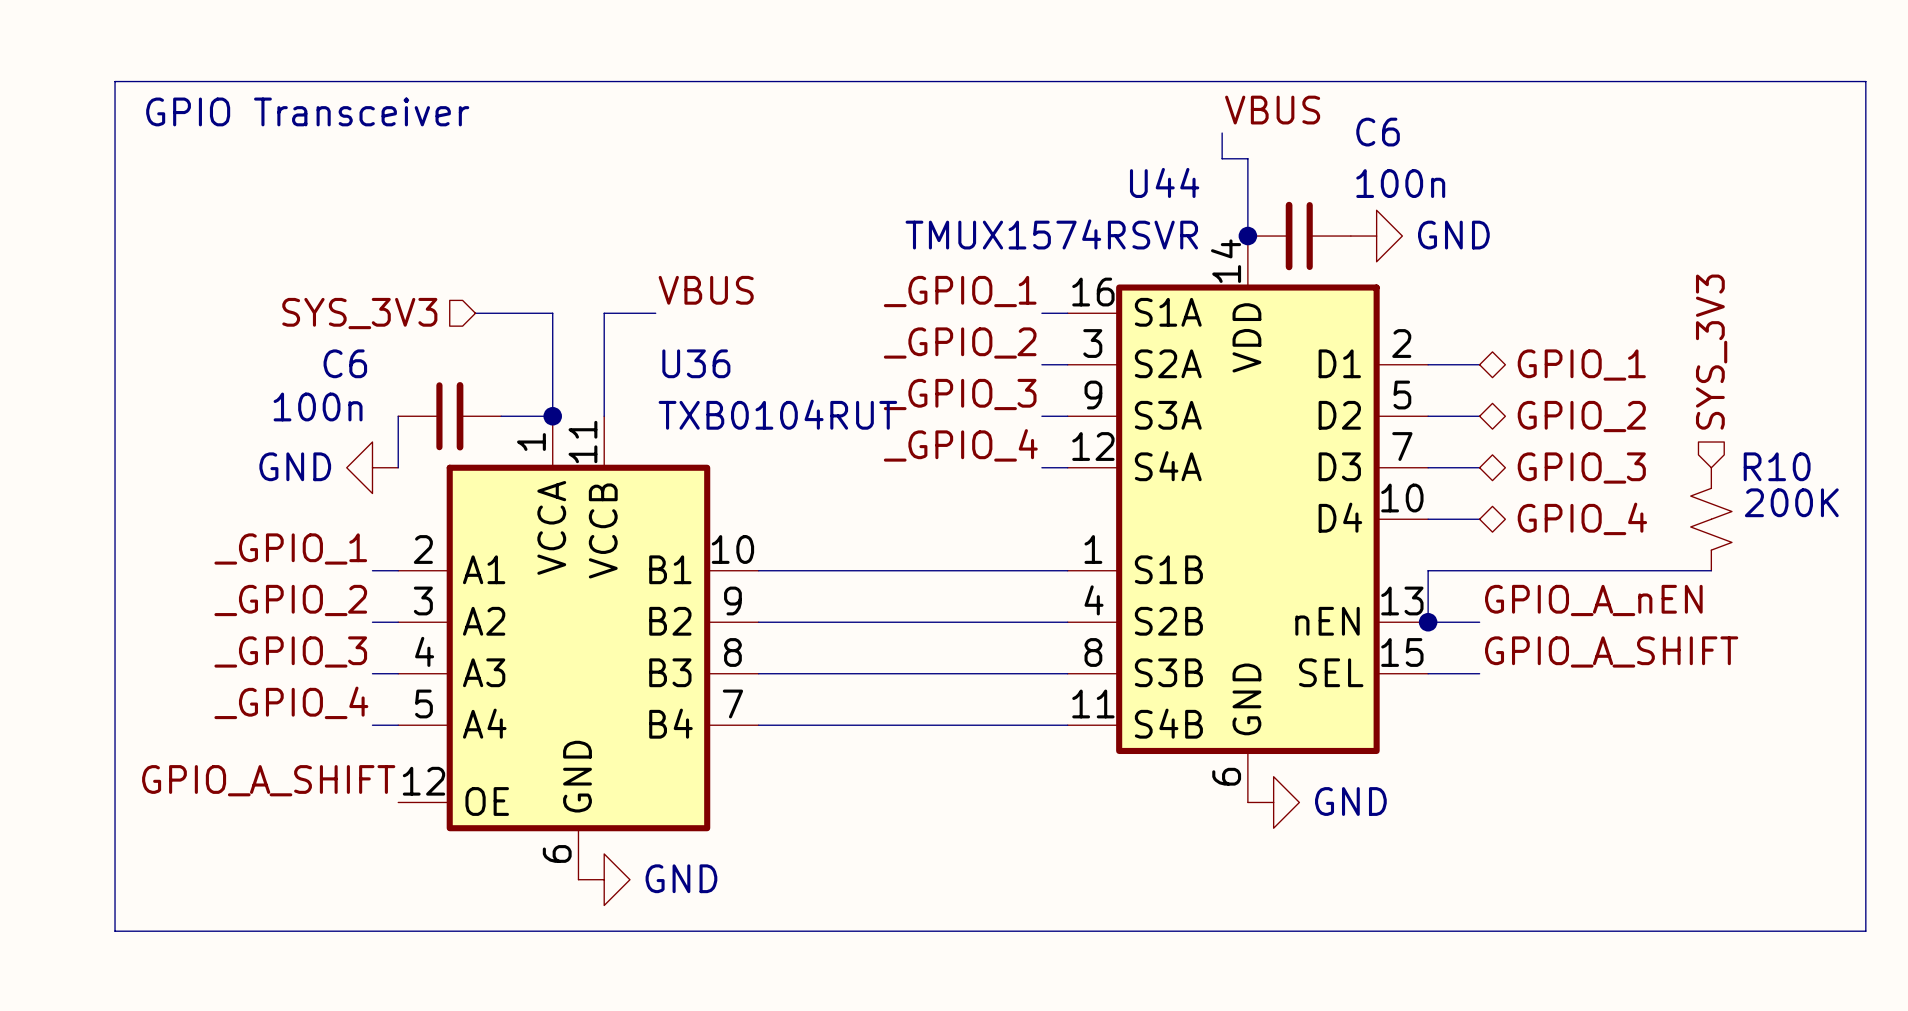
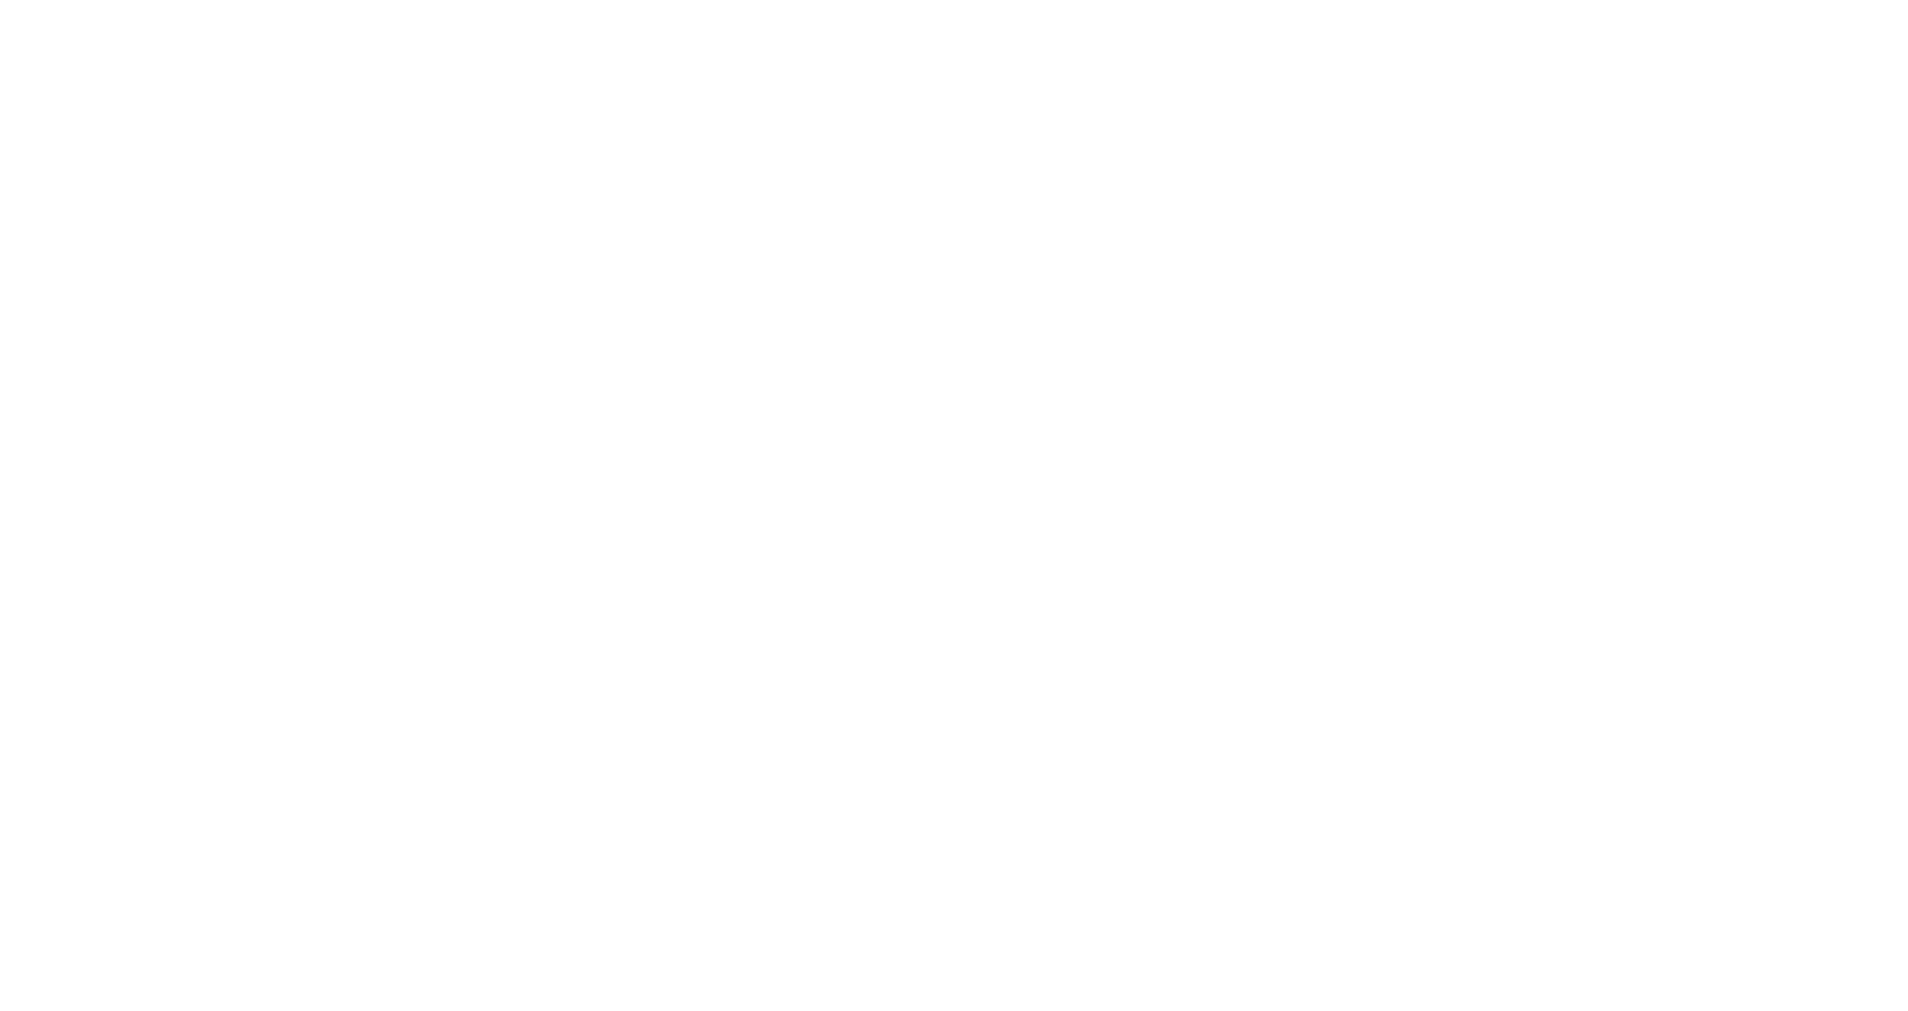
line: (115, 81) (1865, 81) (1865, 931) (115, 931) (115, 81) -> none
label: VBUS (1272, 110) -> none
text: GPIO Transceiver (307, 111) -> none
wire: (1222, 133) (1222, 158) (1247, 158) (1247, 236) -> none
junction: (1247, 236) -> none
C6: 100n (1299, 236) -> none
power symbol: GND (1376, 236) -> none
label: VBUS (706, 290) -> none
label: _GPIO_1 (960, 291) -> none
hierarchical label: SYS_3V3 (359, 313) -> none
wire: (475, 313) (552, 313) (552, 416) (501, 416) -> none
wire: (655, 313) (604, 313) (604, 416) -> none
wire: (1041, 313) (1067, 313) -> none
label: _GPIO_2 (960, 343) -> none
hierarchical label: SYS_3V3 (1711, 352) -> none
wire: (1041, 364) (1067, 364) -> none
wire: (1428, 364) (1479, 364) -> none
hierarchical label: GPIO_1 (1581, 365) -> none
label: _GPIO_3 (960, 394) -> none
wire: (398, 416) (398, 467) -> none
C6: 100n (449, 416) -> none
junction: (552, 416) -> none
wire: (1041, 416) (1067, 416) -> none
wire: (1428, 416) (1479, 416) -> none
hierarchical label: GPIO_2 (1581, 416) -> none
label: _GPIO_4 (960, 445) -> none
power symbol: GND (372, 467) -> none
wire: (1041, 467) (1067, 467) -> none
wire: (1428, 467) (1479, 467) -> none
hierarchical label: GPIO_3 (1581, 468) -> none
hierarchical label: GPIO_4 (1582, 518) -> none
U44: TMUX1574RSVR (1247, 519) -> none
wire: (1428, 519) (1479, 519) -> none
R10: 200K (1711, 519) -> none
label: _GPIO_1 (290, 548) -> none
wire: (372, 570) (398, 570) -> none
wire: (758, 570) (1067, 570) -> none
wire: (1711, 570) (1428, 570) (1428, 622) (1479, 622) -> none
label: _GPIO_2 (290, 600) -> none
label: GPIO_A_nEN (1593, 600) -> none
wire: (372, 622) (398, 622) -> none
wire: (758, 622) (1067, 622) -> none
junction: (1428, 622) -> none
U36: TXB0104RUT (578, 647) -> none
label: _GPIO_3 (290, 651) -> none
label: GPIO_A_SHIFT (1611, 651) -> none
wire: (372, 673) (398, 673) -> none
wire: (758, 673) (1067, 673) -> none
wire: (1428, 673) (1479, 673) -> none
label: _GPIO_4 (291, 702) -> none
wire: (372, 725) (398, 725) -> none
wire: (758, 725) (1067, 725) -> none
label: GPIO_A_SHIFT (268, 780) -> none
power symbol: GND (1273, 802) -> none
power symbol: GND (604, 879) -> none

